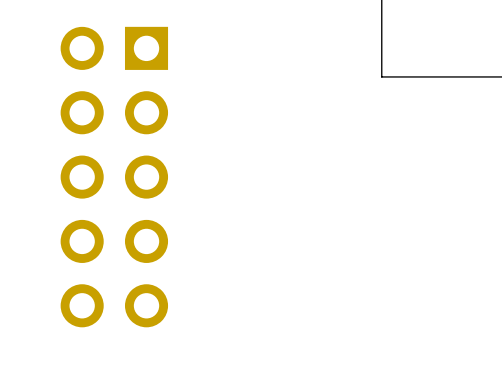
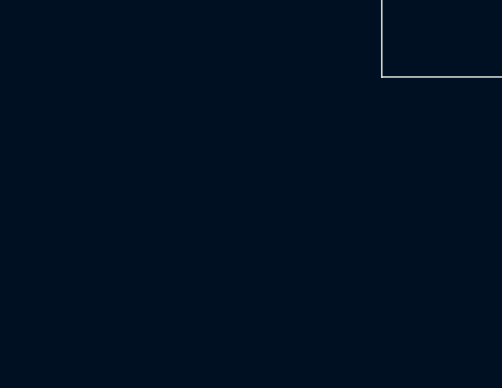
part: (114, 177) -> none

